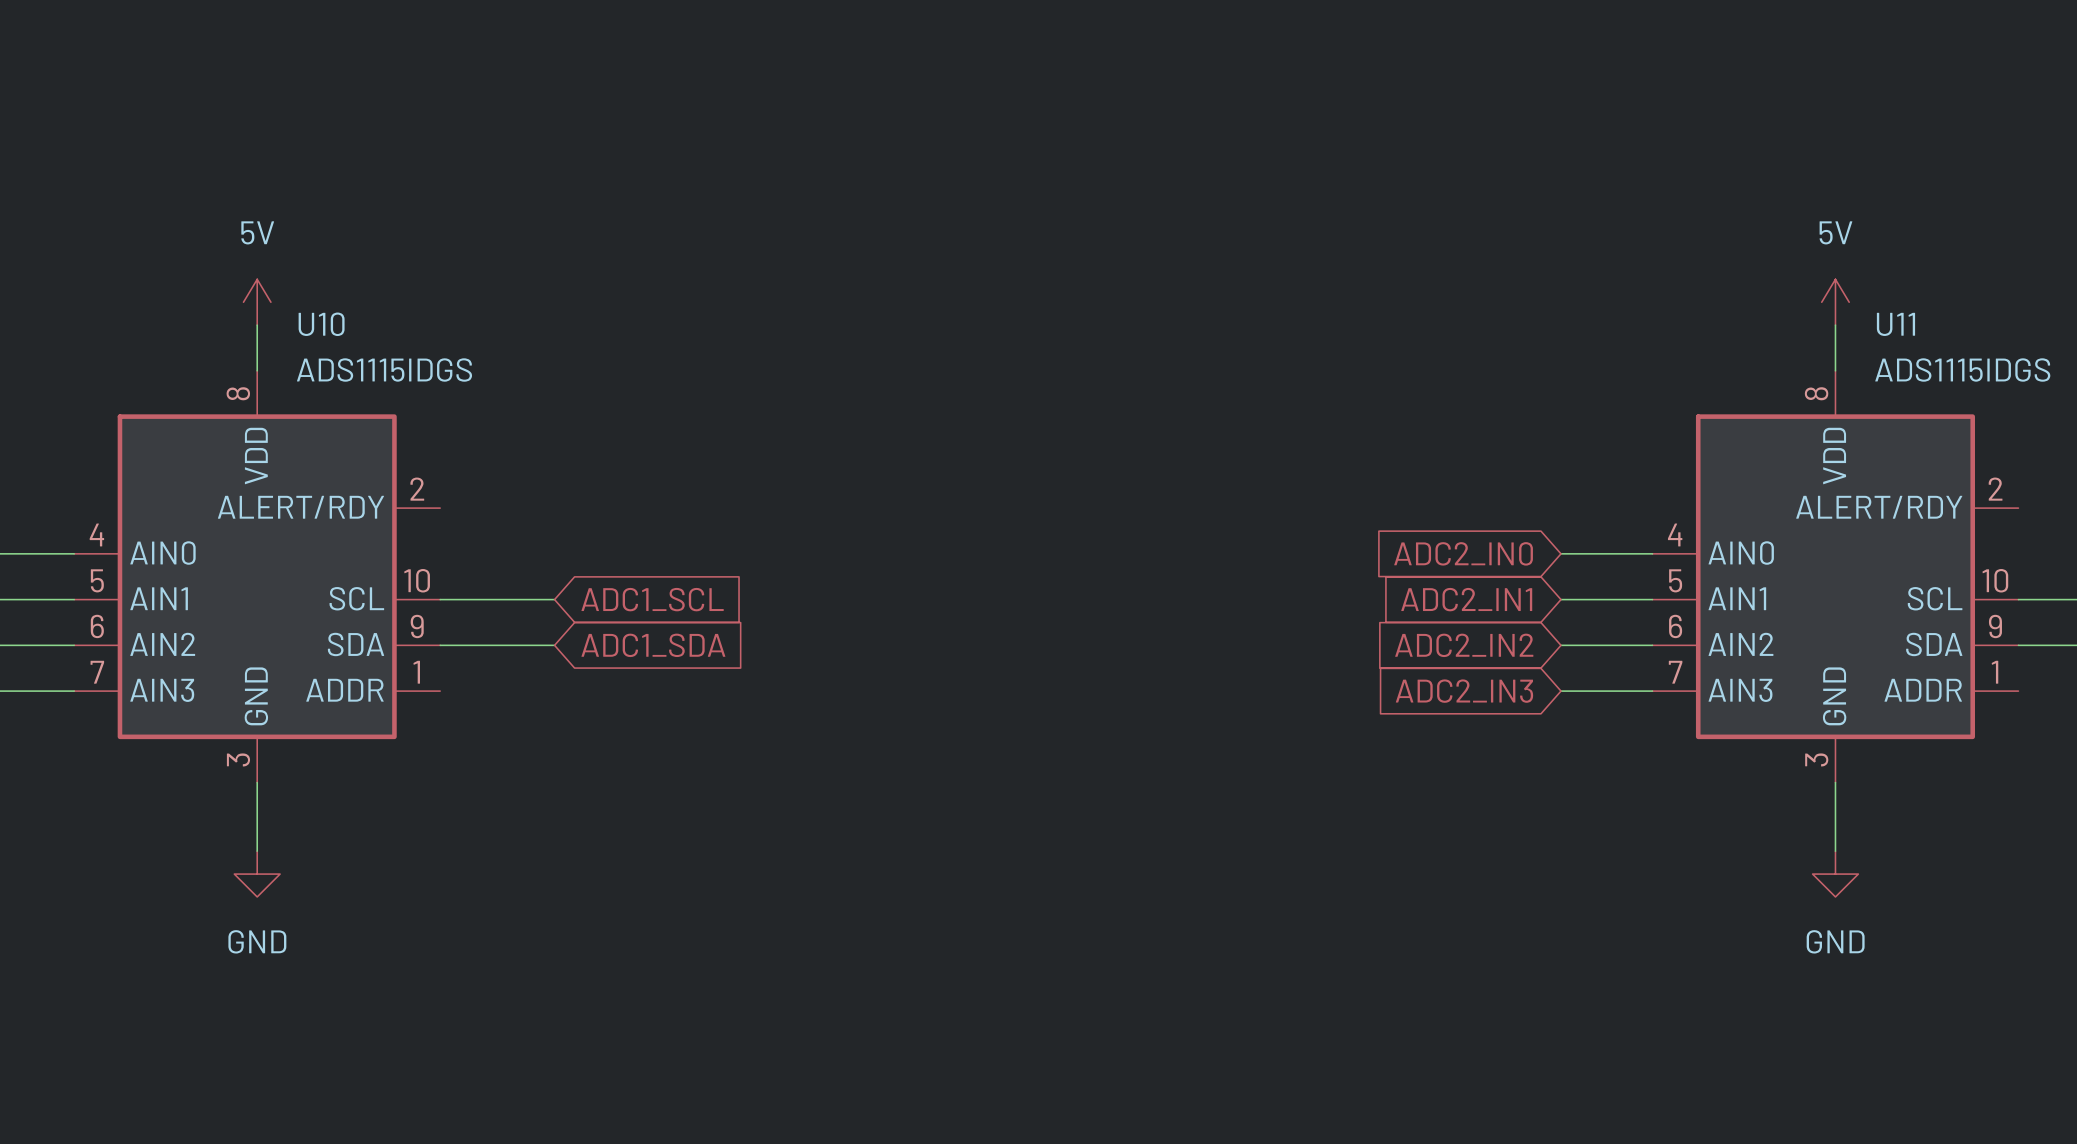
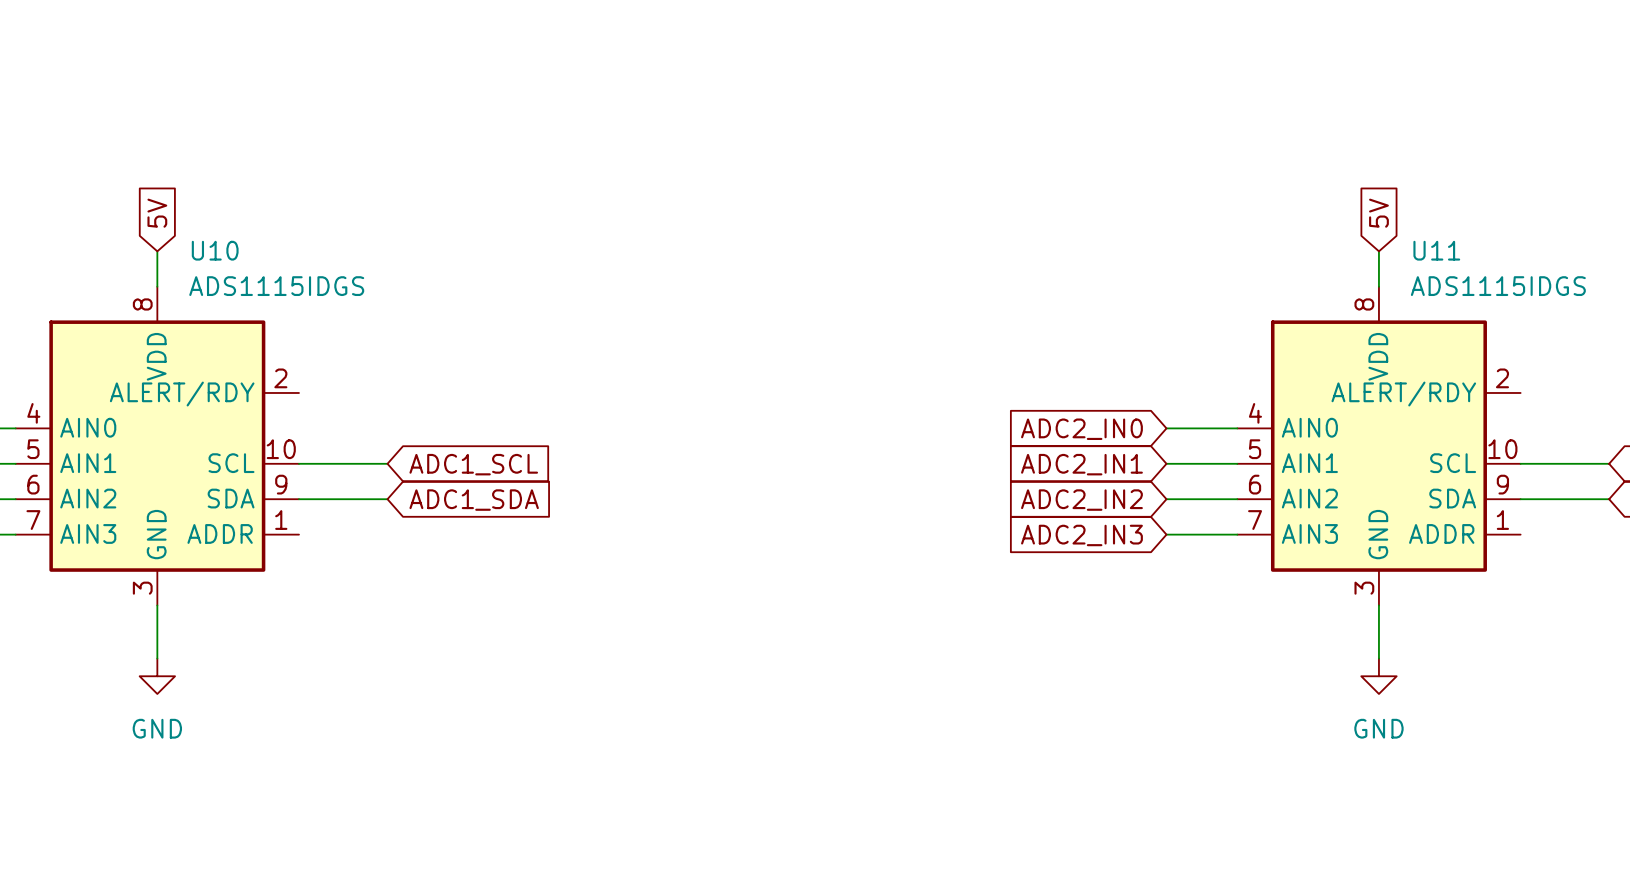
global label: none -> 5V (157, 213)
global label: none -> 5V (1378, 213)
power symbol: 5V (257, 302) -> none
power symbol: 5V (1835, 302) -> none

